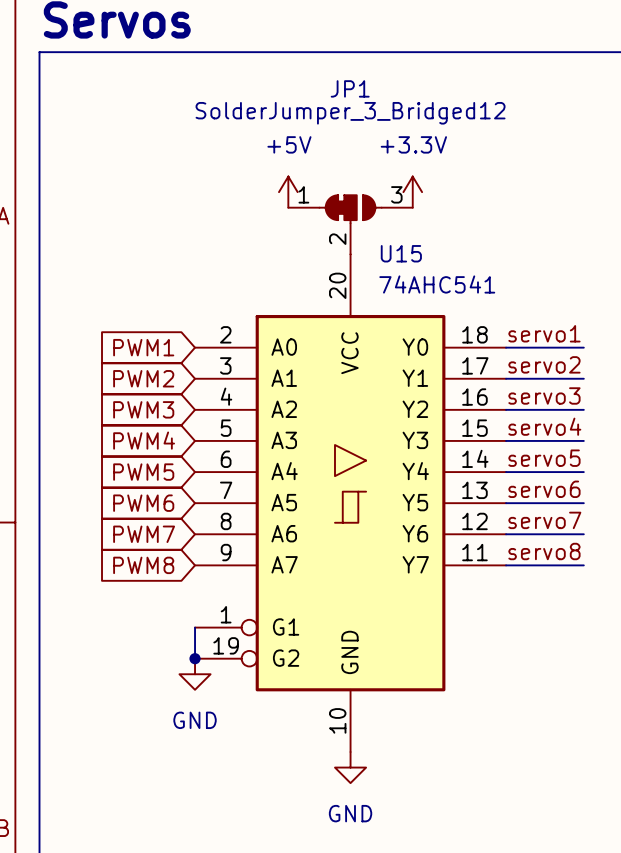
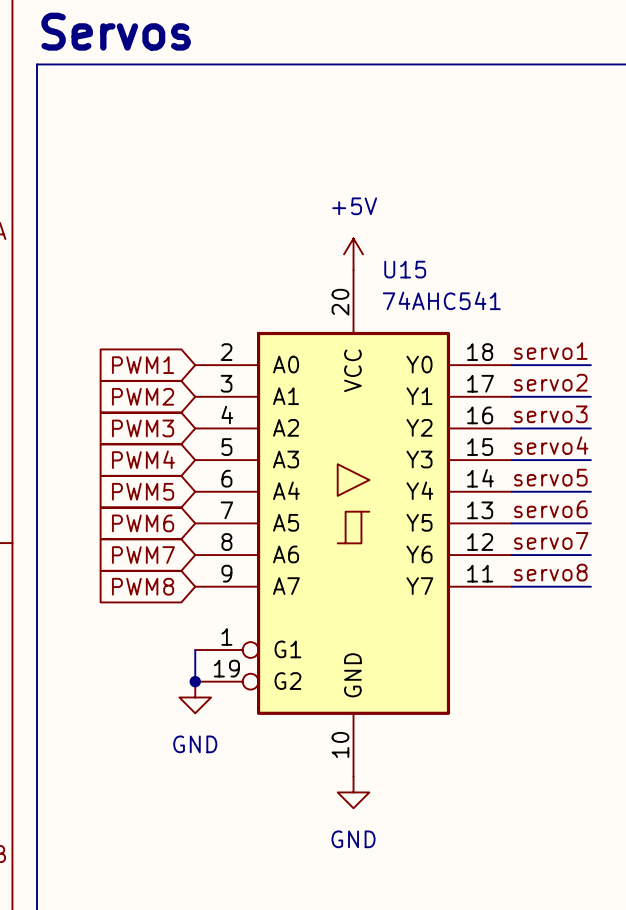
power symbol position: +5V (288, 192) -> +5V (353, 254)
power symbol: +3.3V (412, 192) -> none
JP1: SolderJumper_3_Bridged12 (350, 224) -> none

